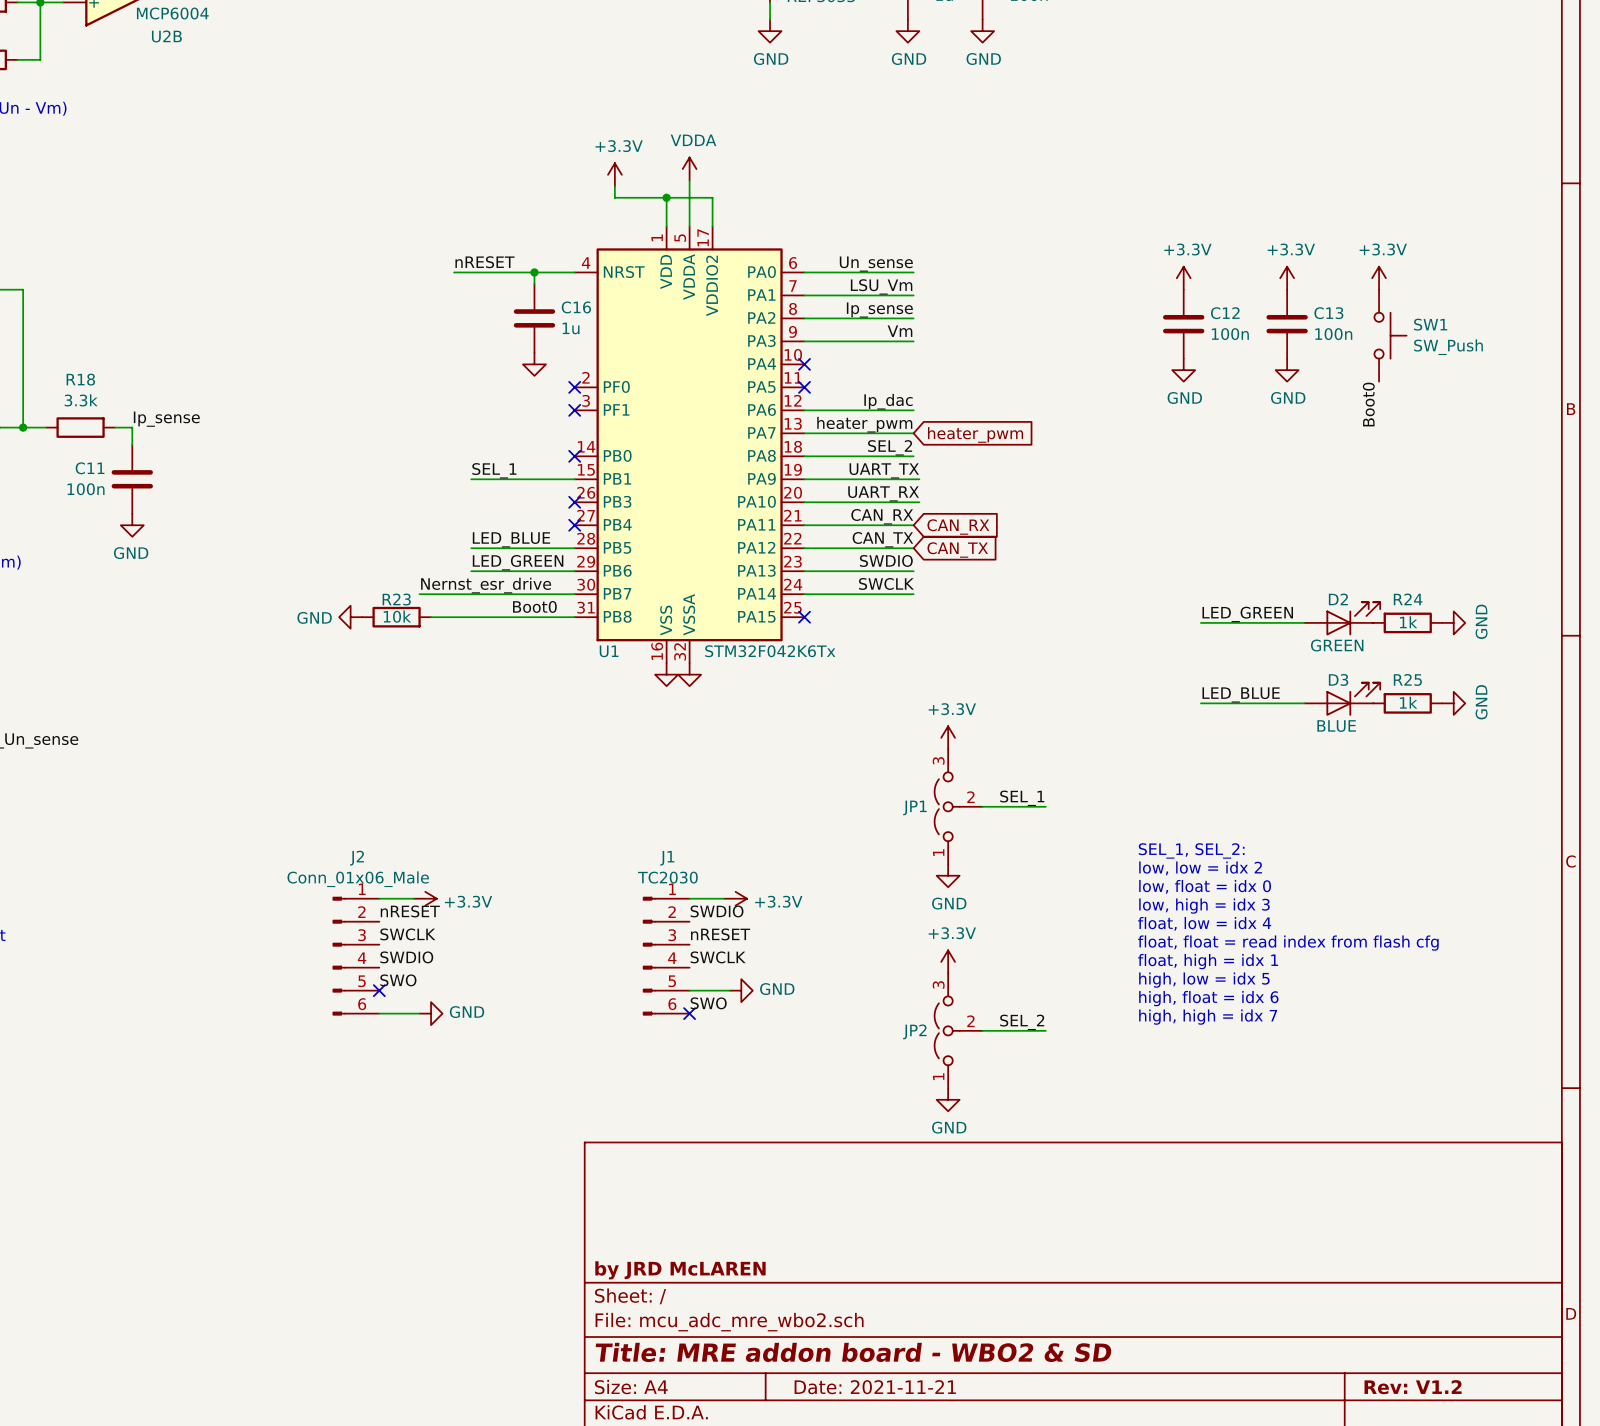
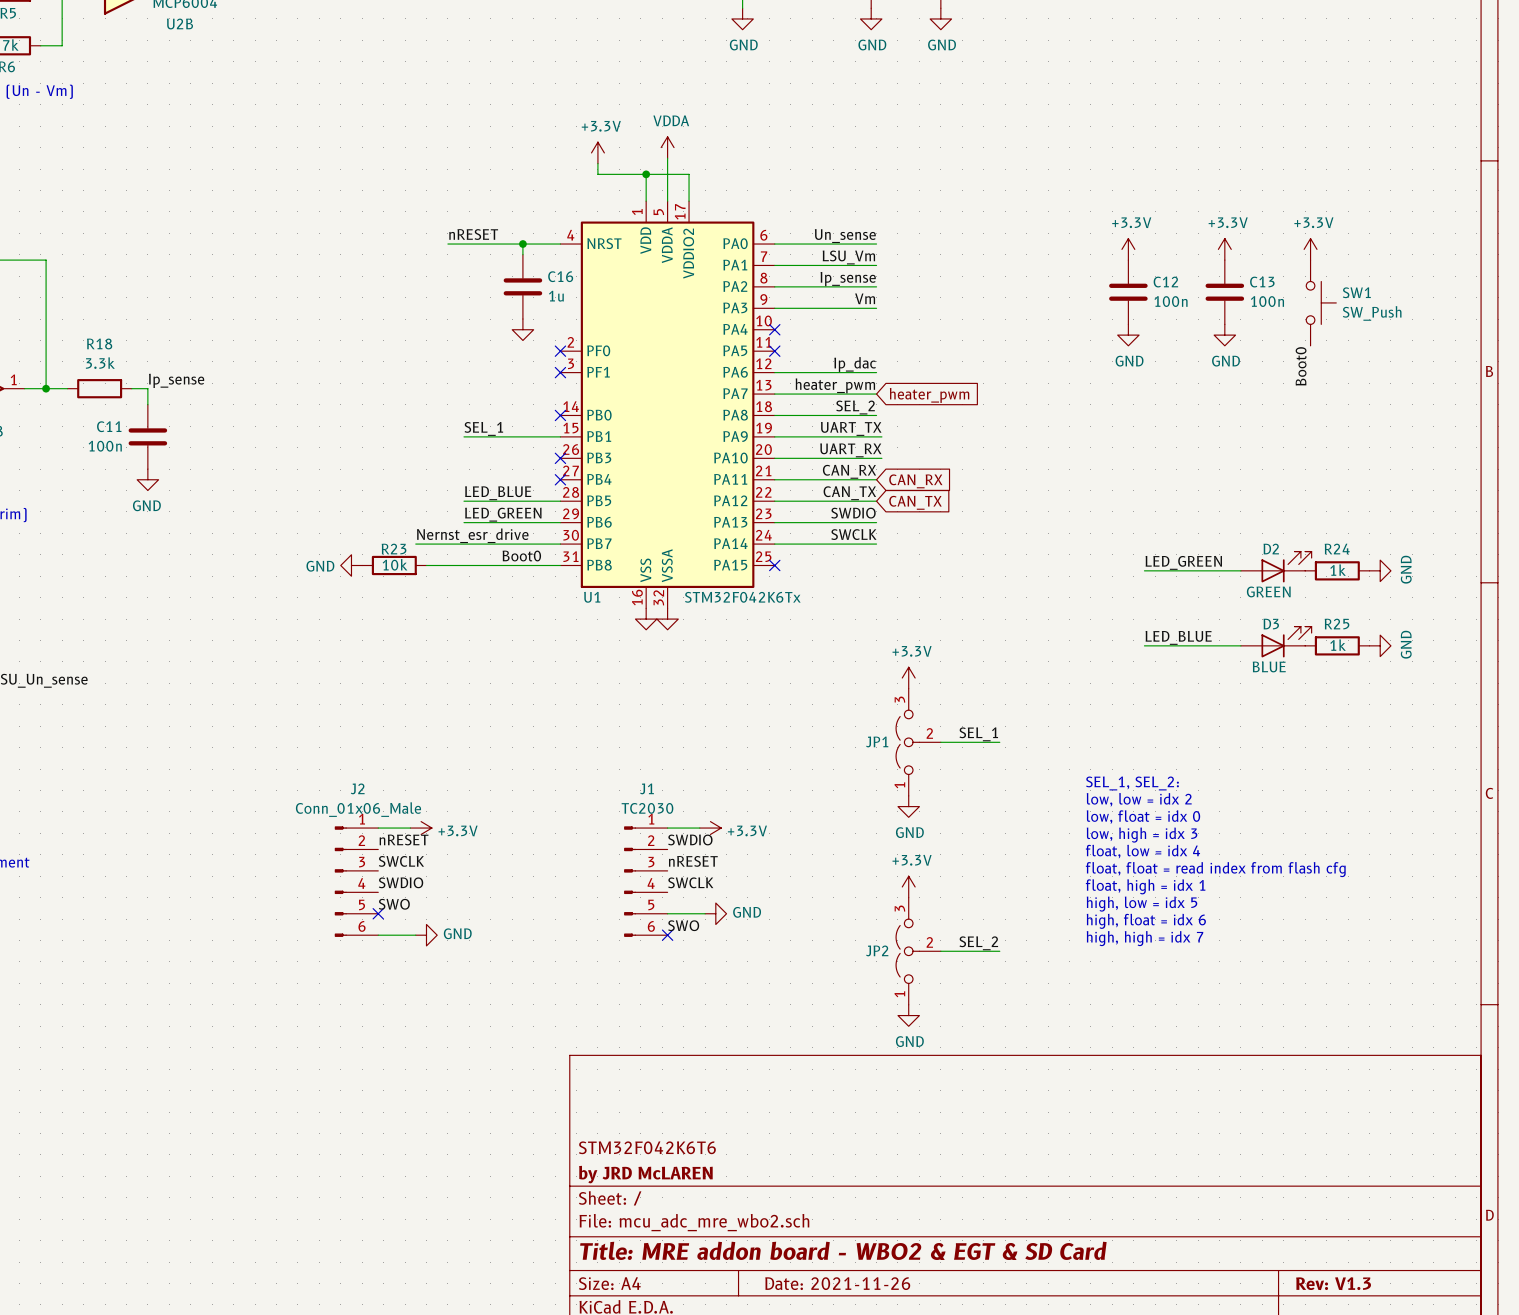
title block: none -> STM32F042K6T6 (647, 1147)
title block: Title: MRE addon board - WBO2 & SD (853, 1352) -> Title: MRE addon board - WBO2 & EGT & SD Card (843, 1250)
title block: Date: 2021-11-21 (875, 1387) -> Date: 2021-11-26 (837, 1283)
title block: Rev: V1.2 (1413, 1387) -> Rev: V1.3 (1333, 1283)

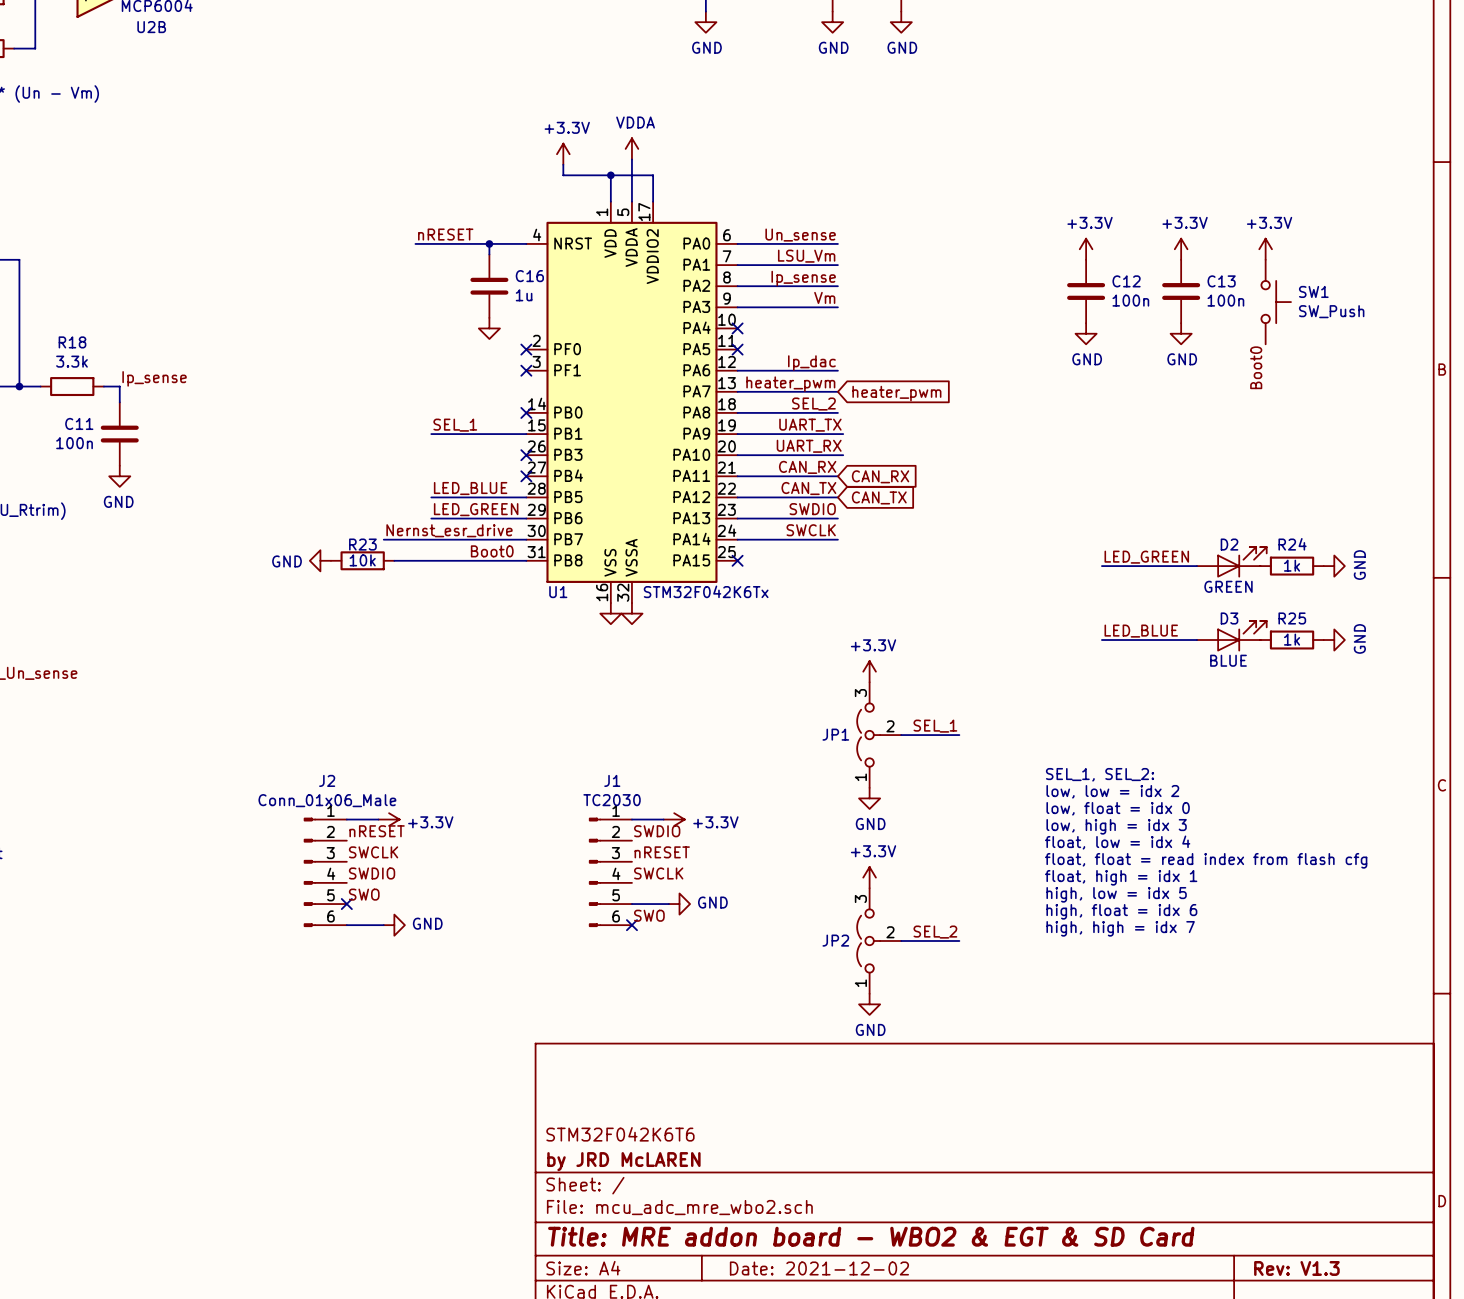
title block: Date: 2021-11-26 (837, 1283) -> Date: 2021-12-02 (819, 1268)

